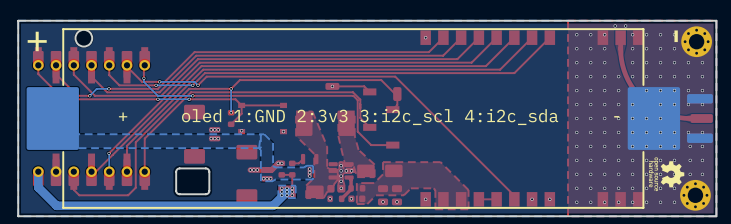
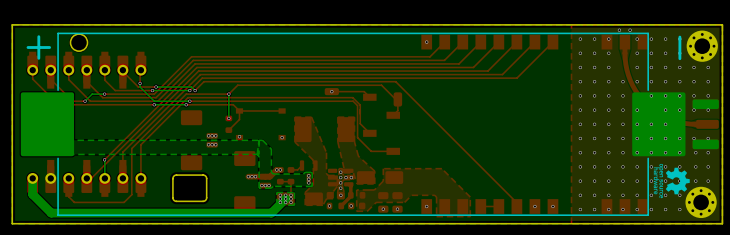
text: + oled 1:GND 2:3v3 3:i2c_scl 4:i2c_sda - (369, 117) -> none

